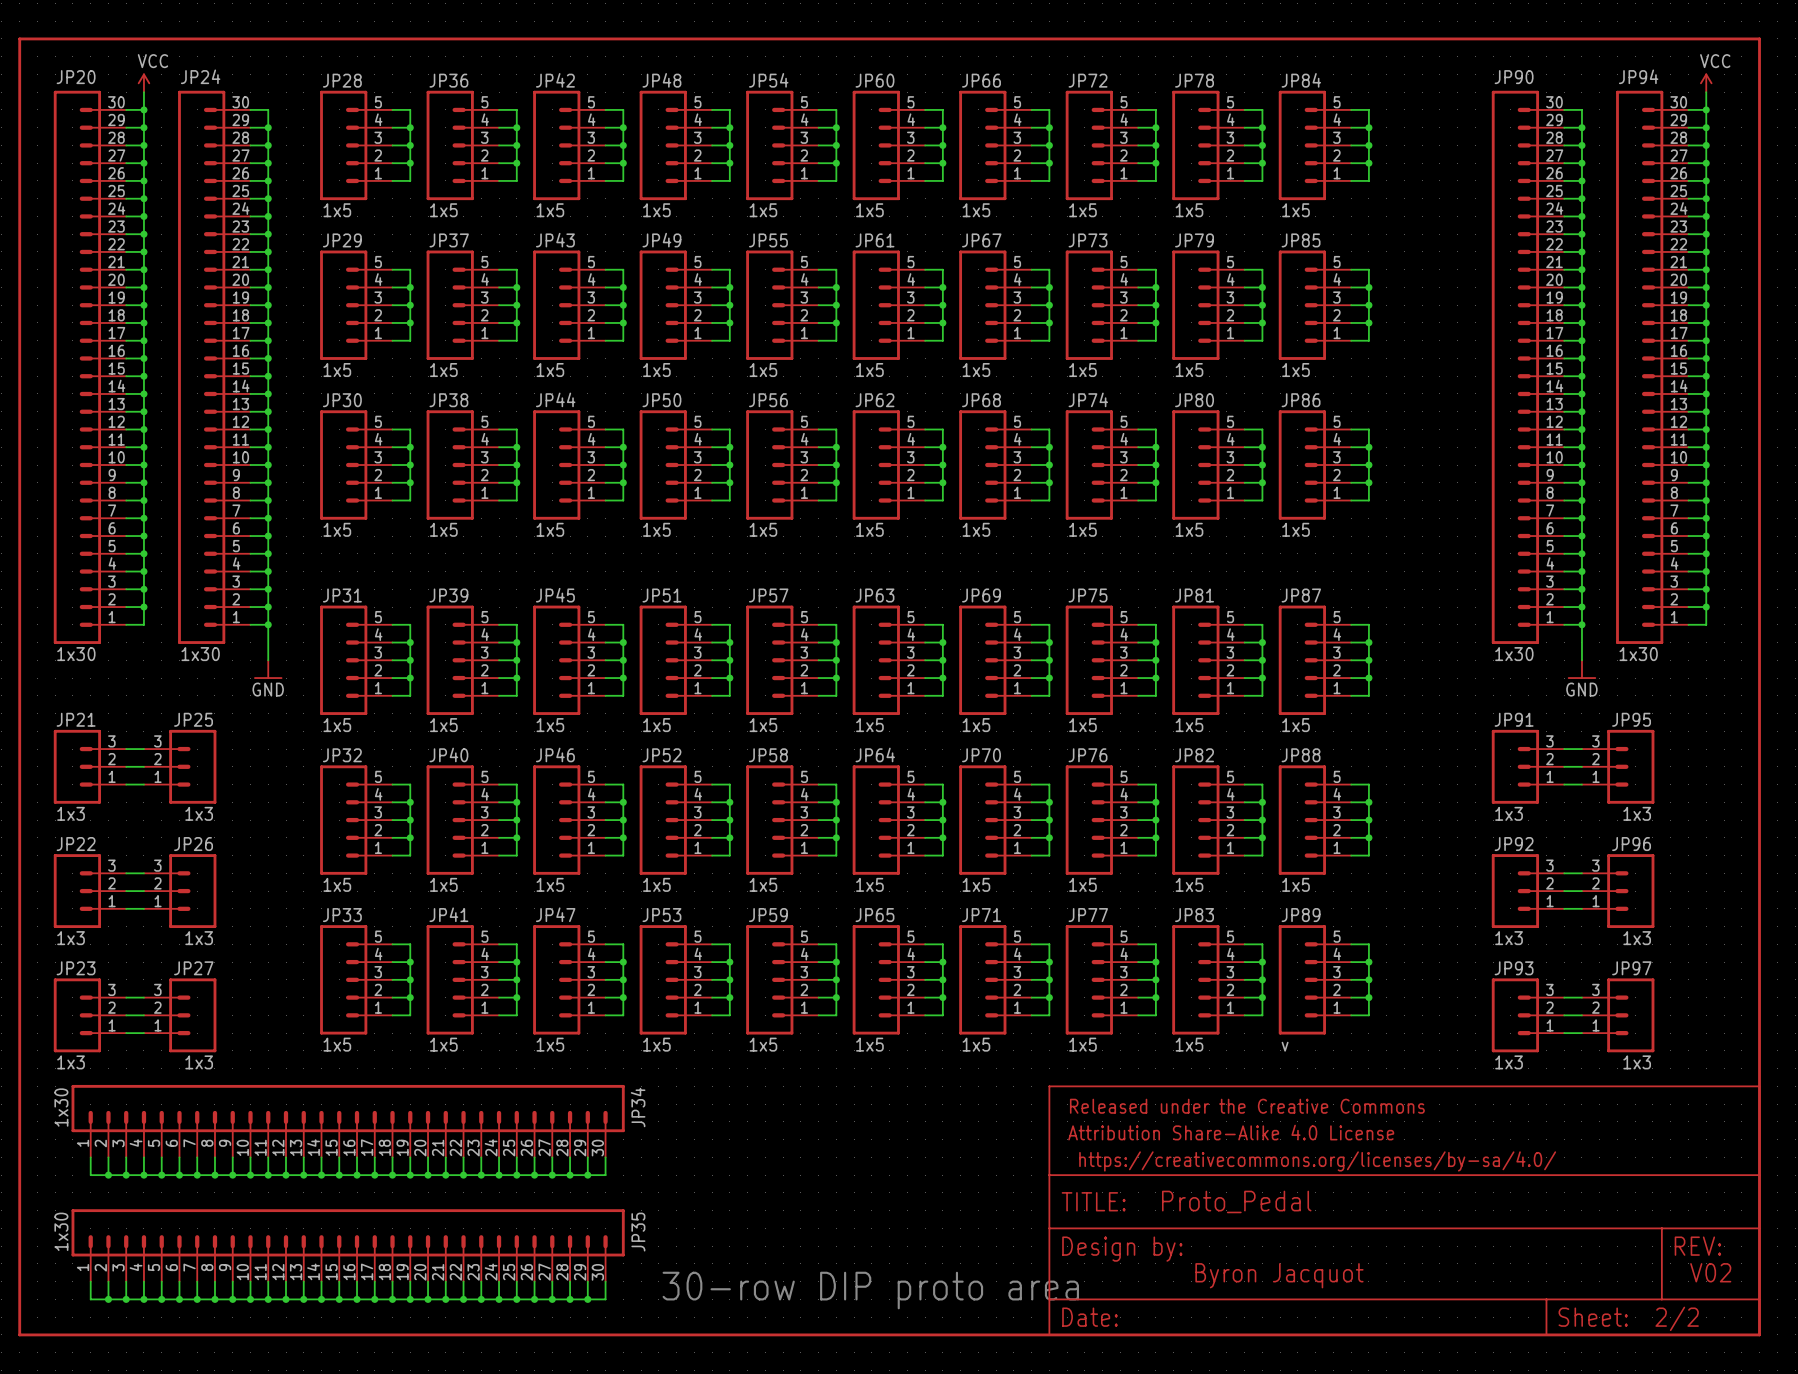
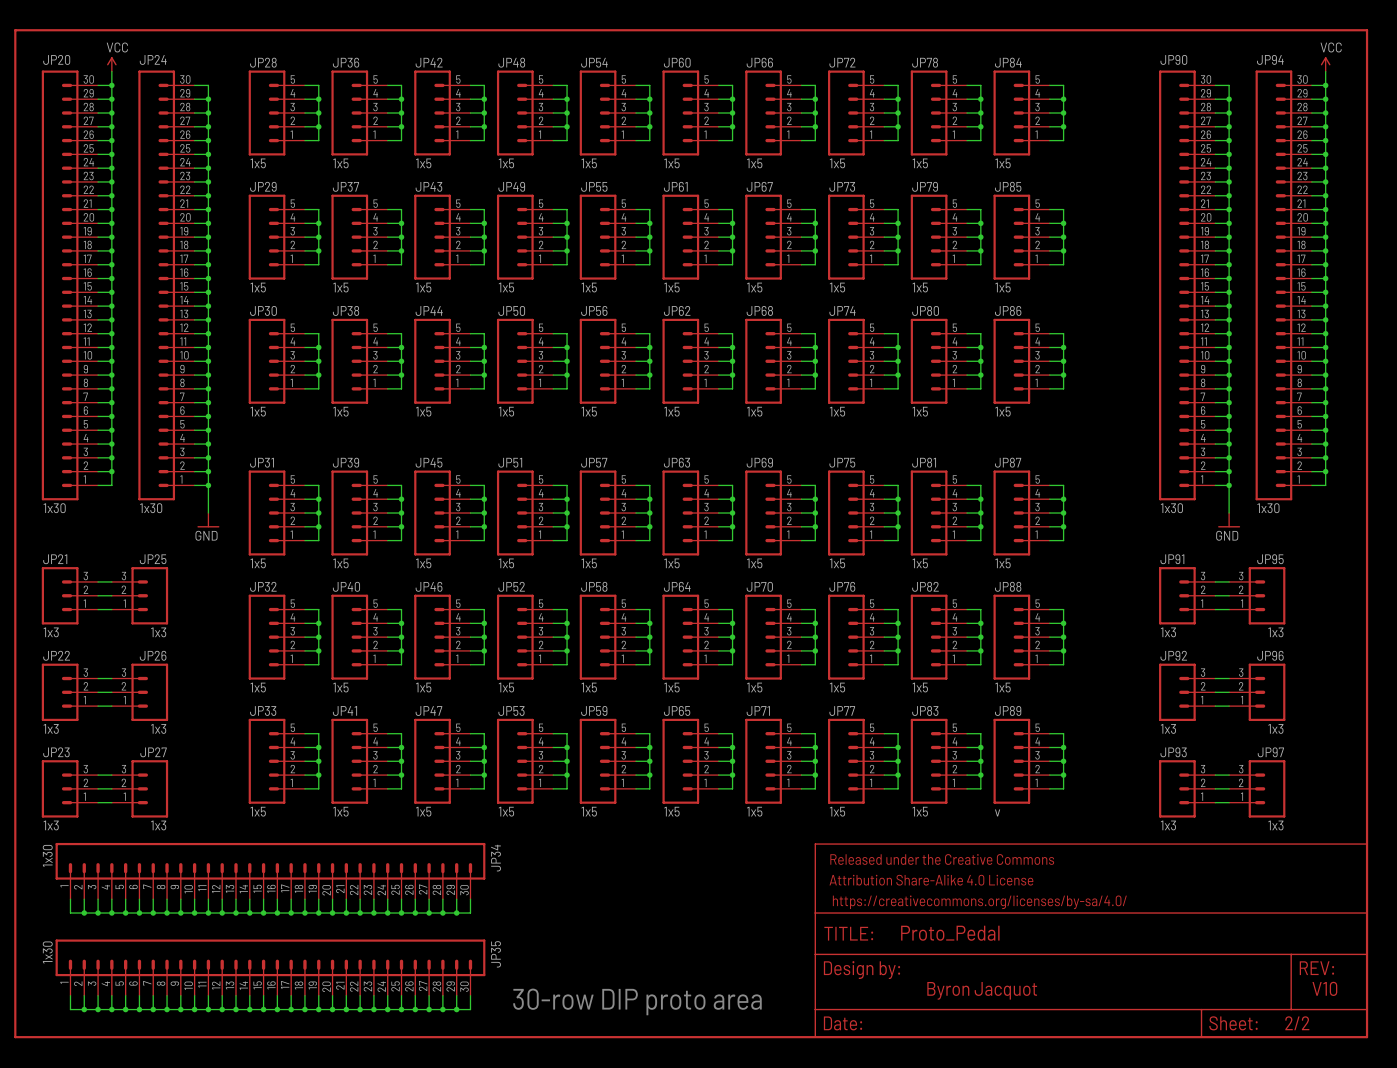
text: V02 (1710, 1272) -> V10 (1324, 988)

